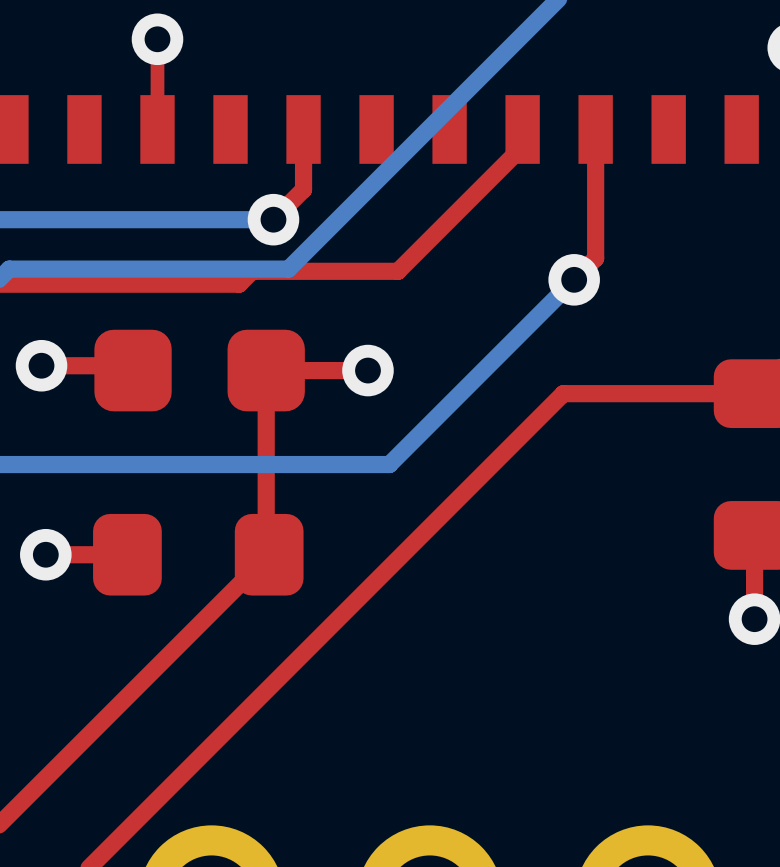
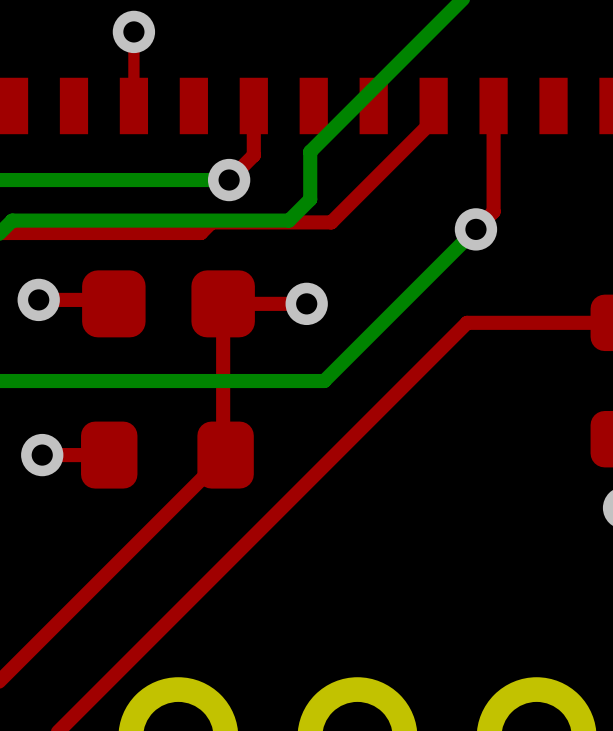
bottom track: (372, 185) (288, 269) -> (310, 151) (310, 199) (289, 220) (241, 220)

